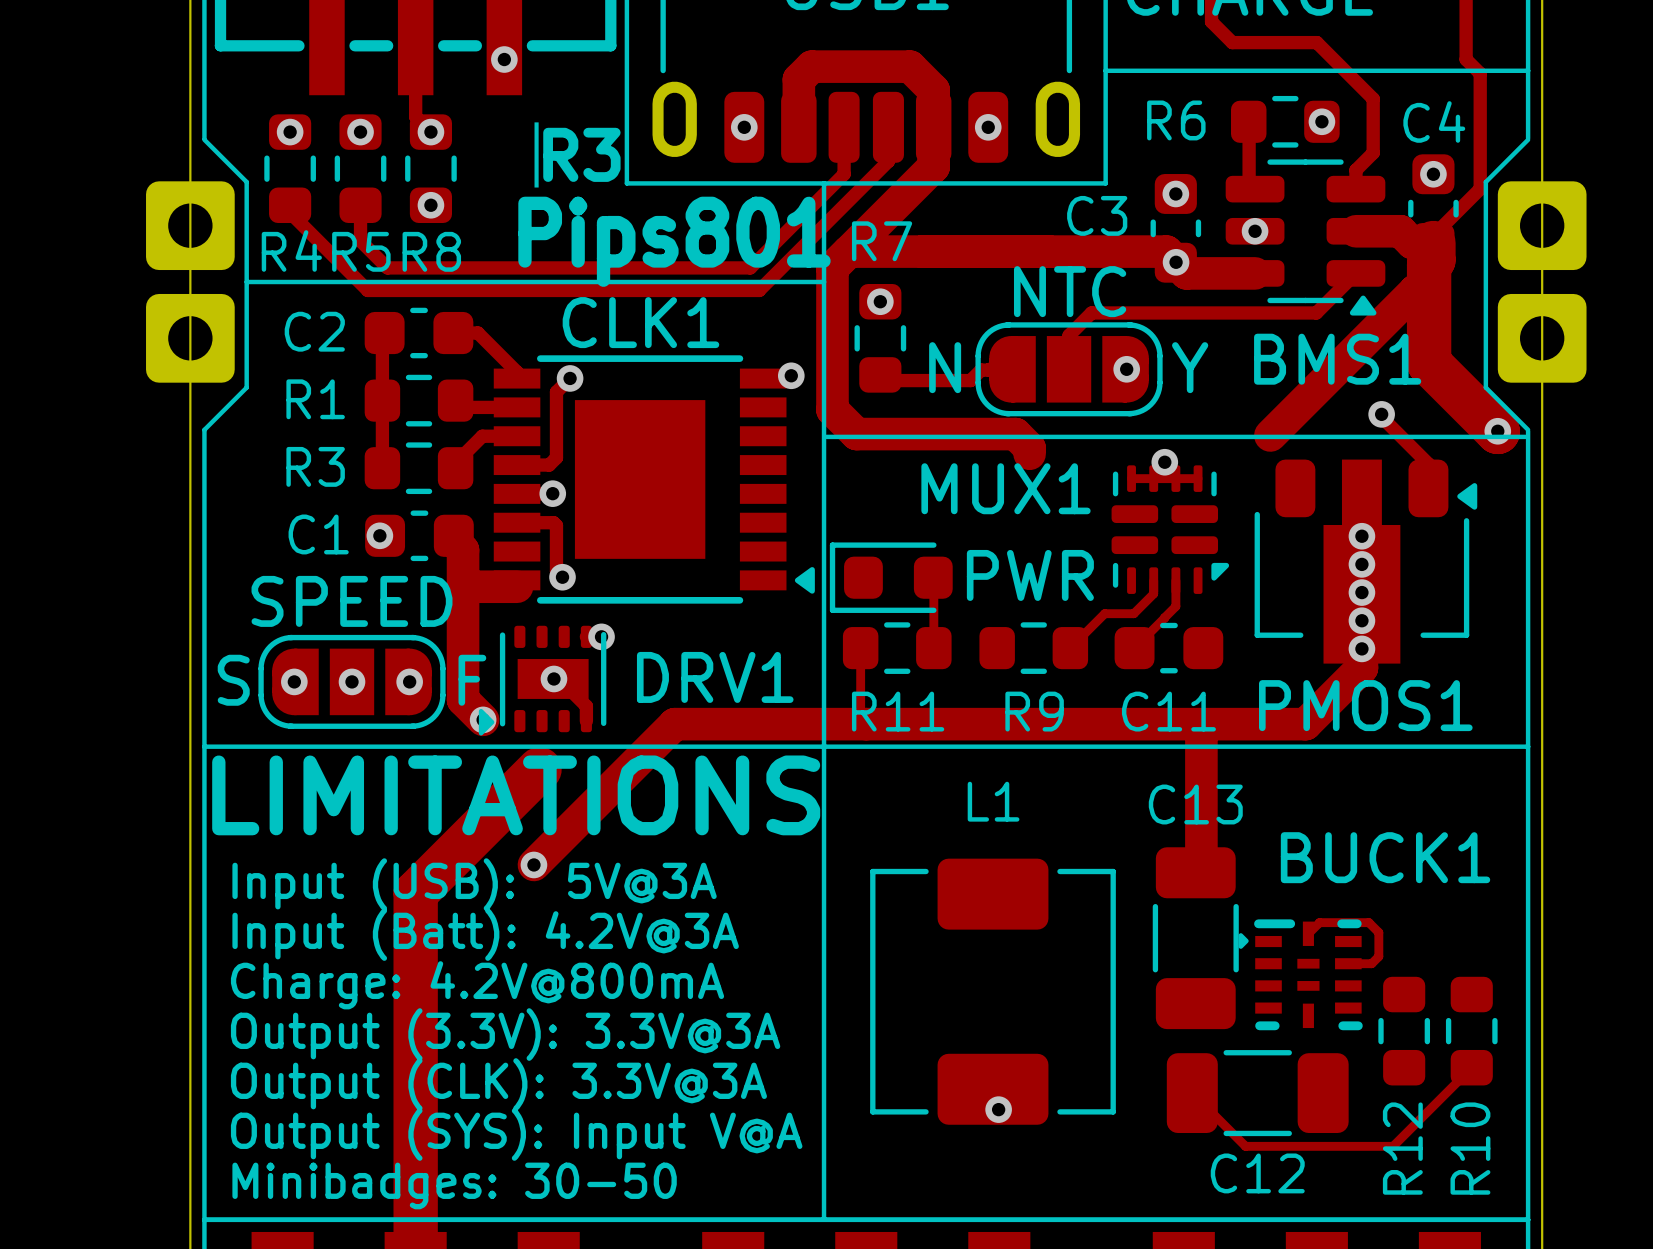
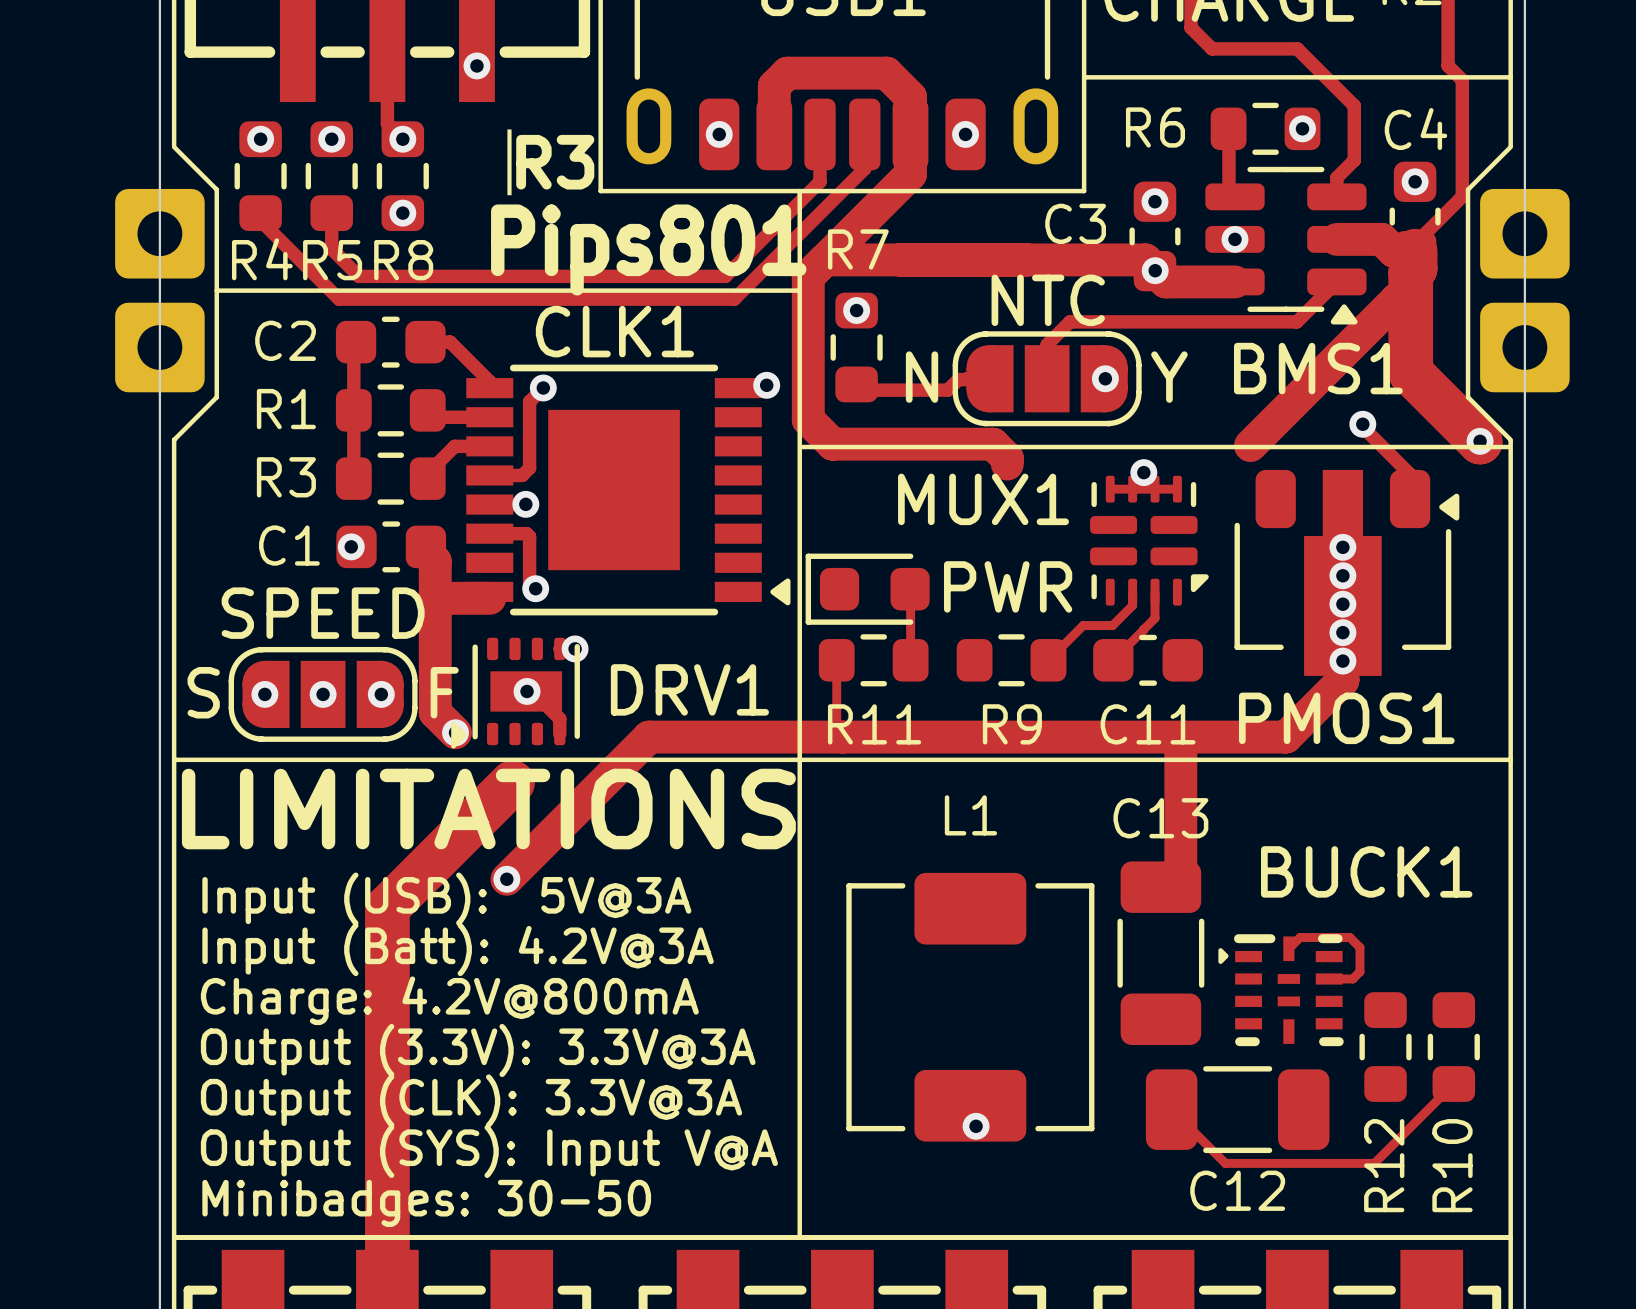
C13 position: (1195, 938) -> (1160, 953)

